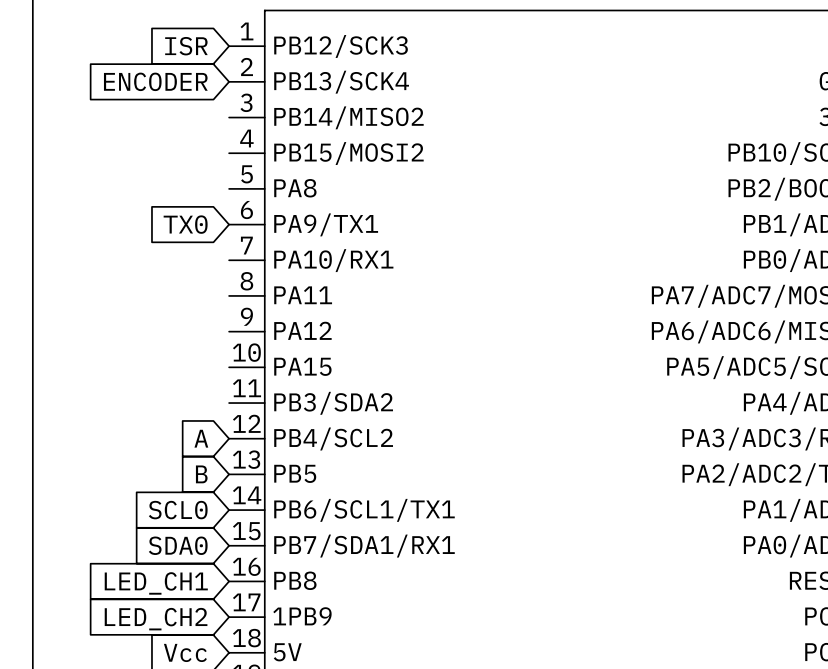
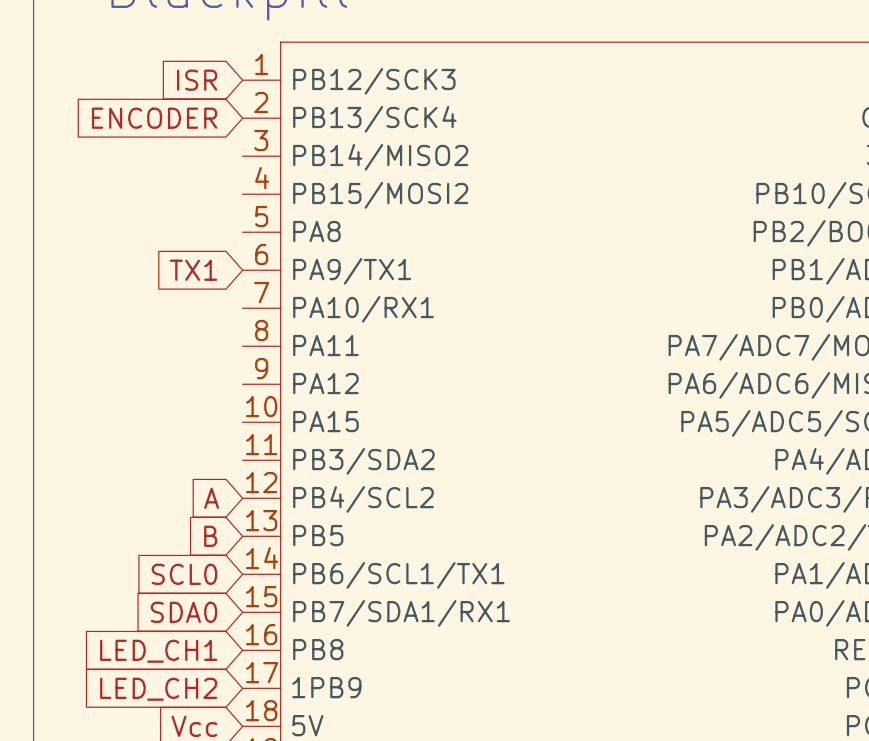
global label: TX0 (185, 224) -> TX1 (193, 270)

